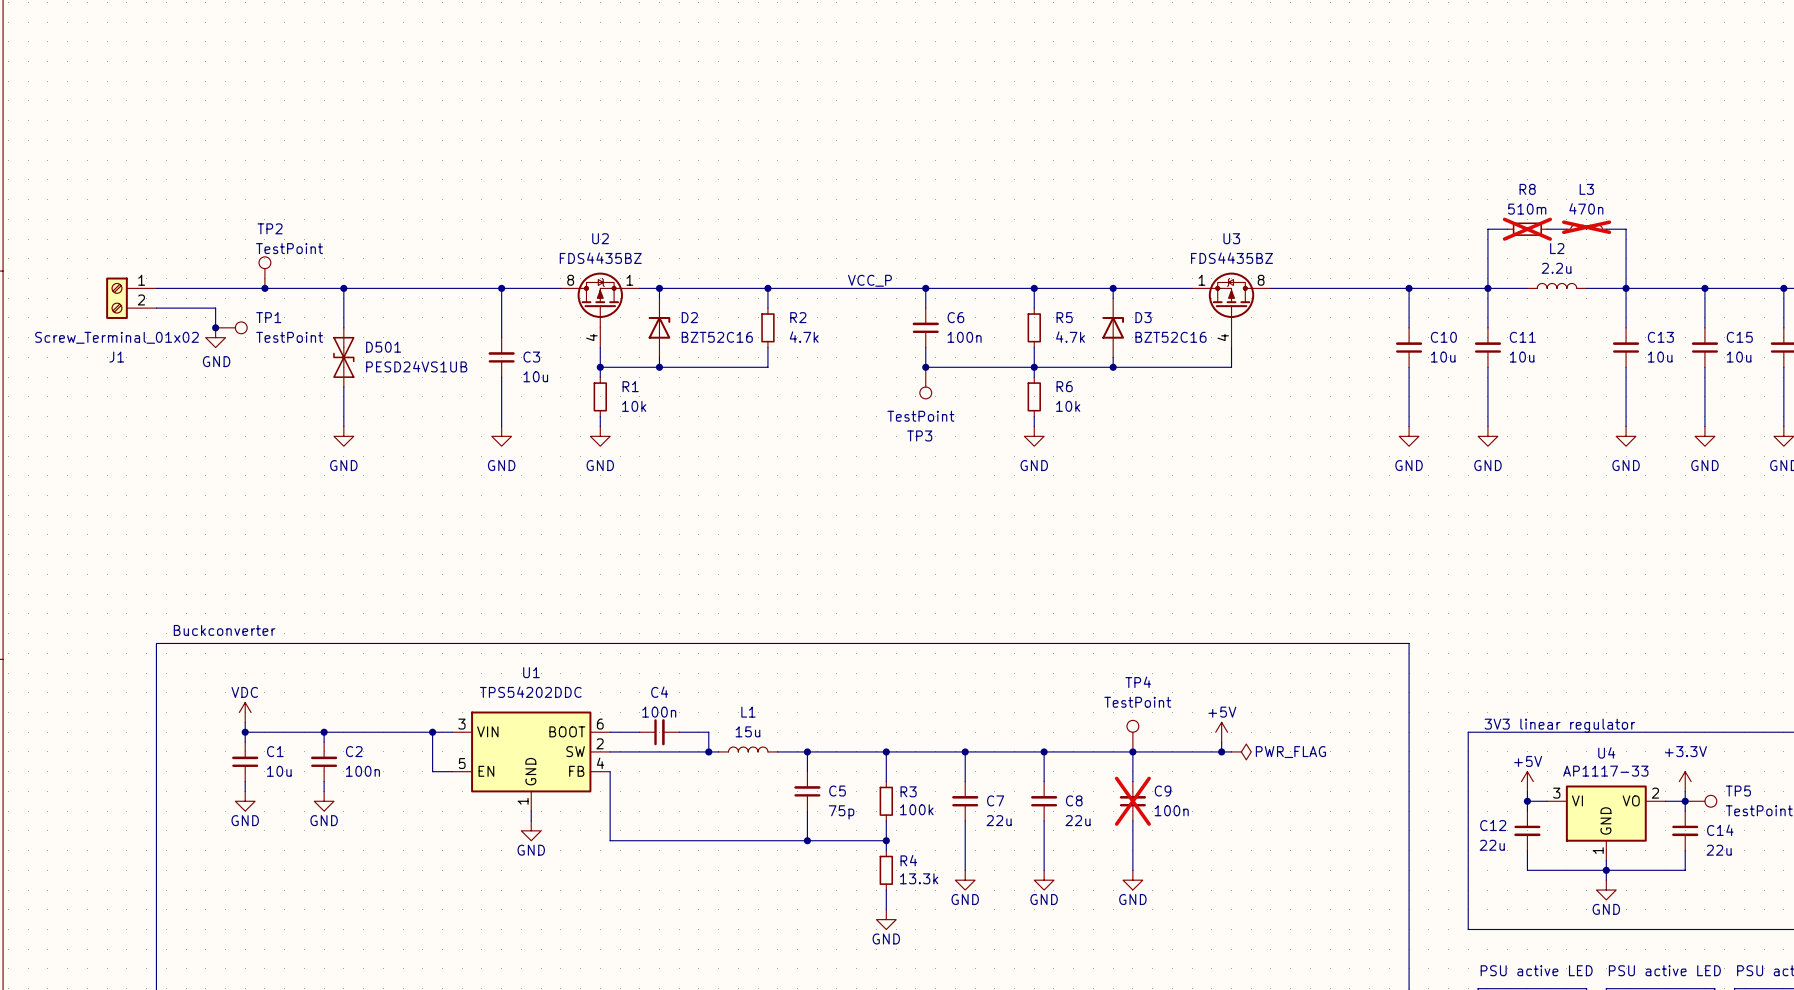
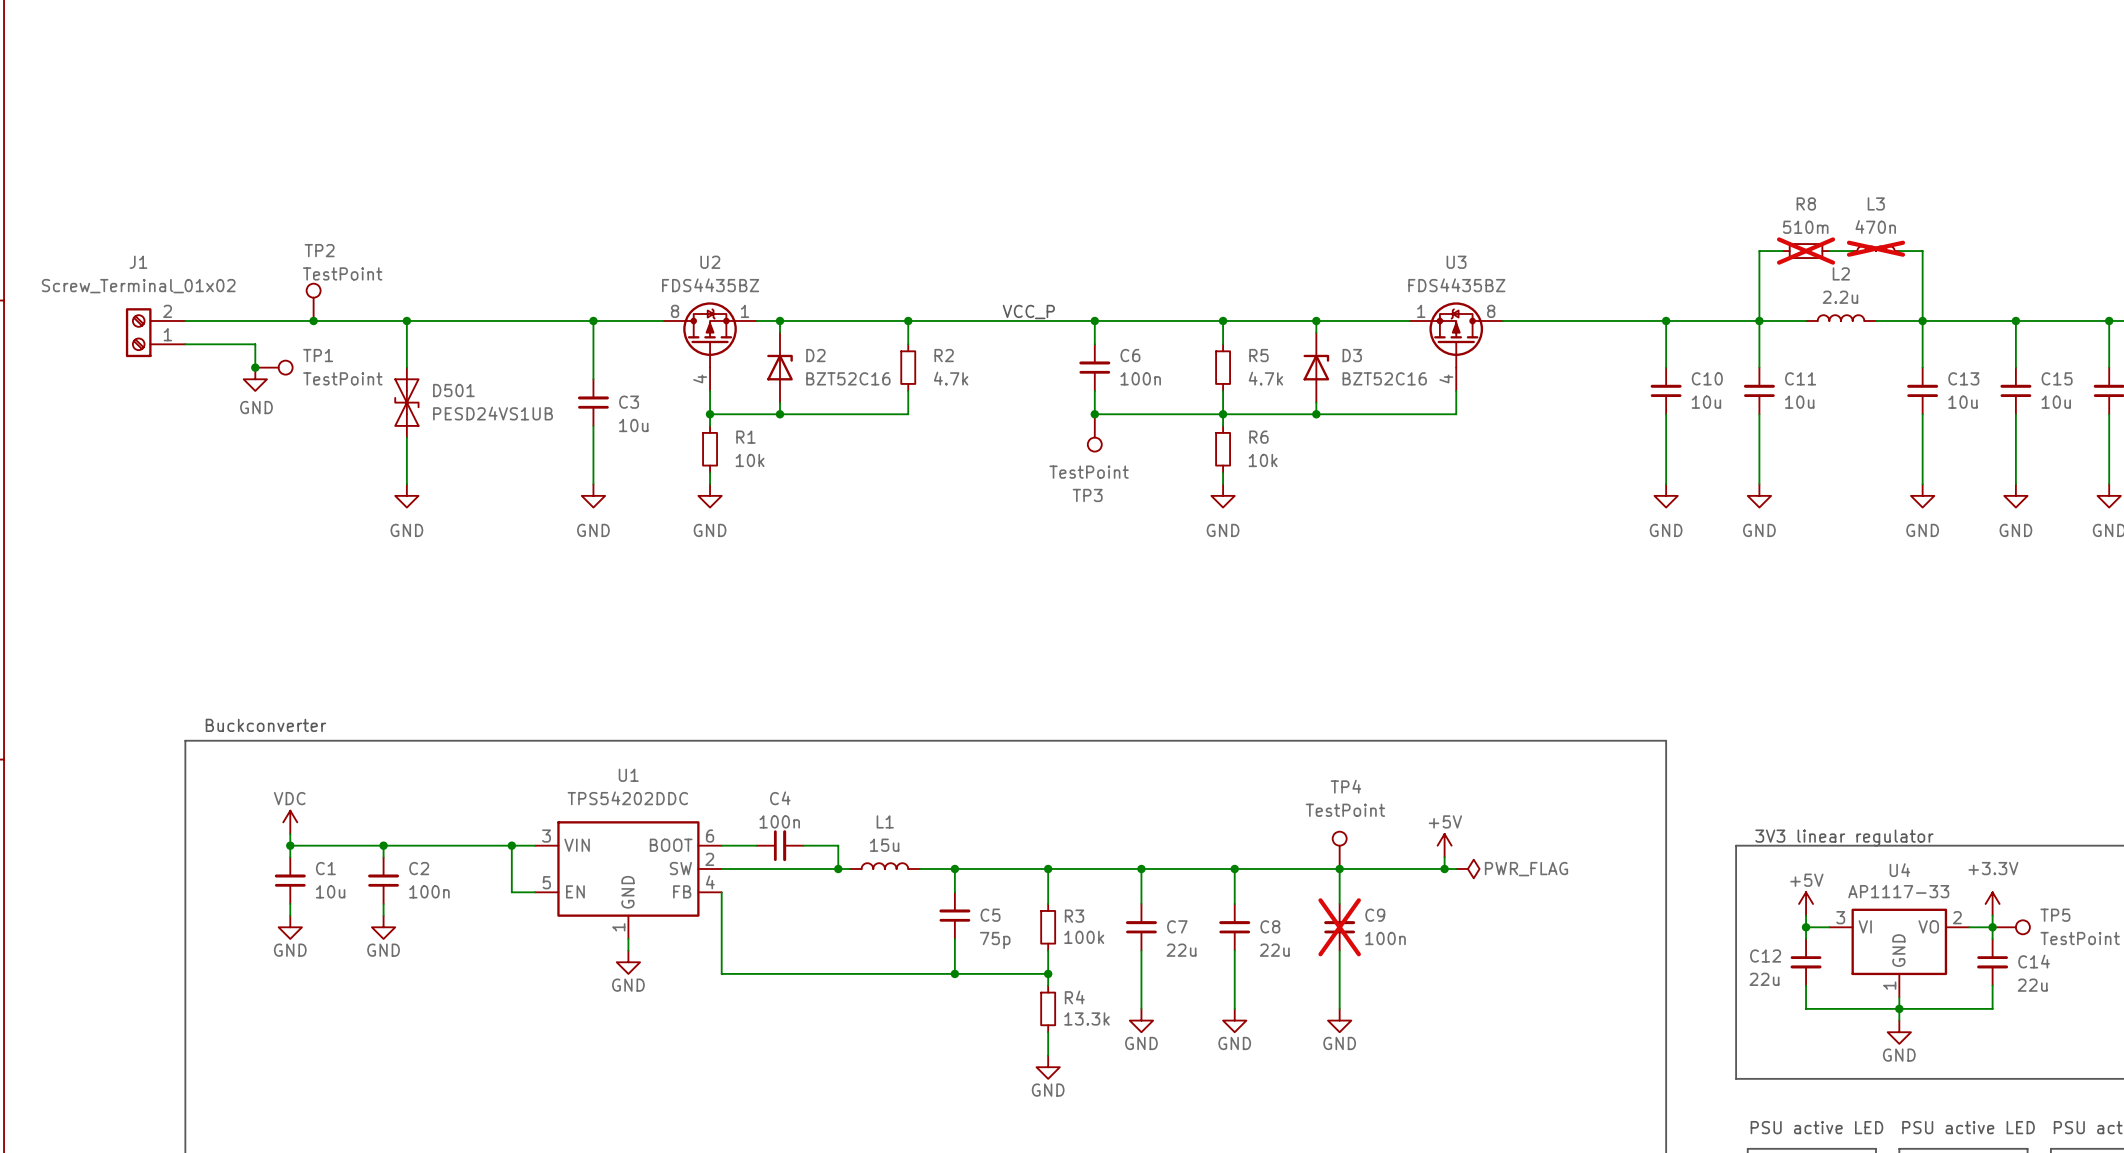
J1 flip: as is (116, 298) -> up-down (138, 332)

